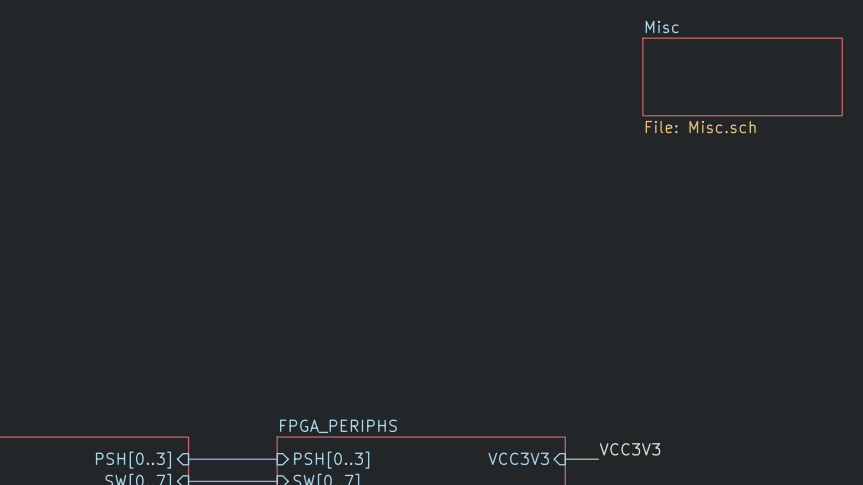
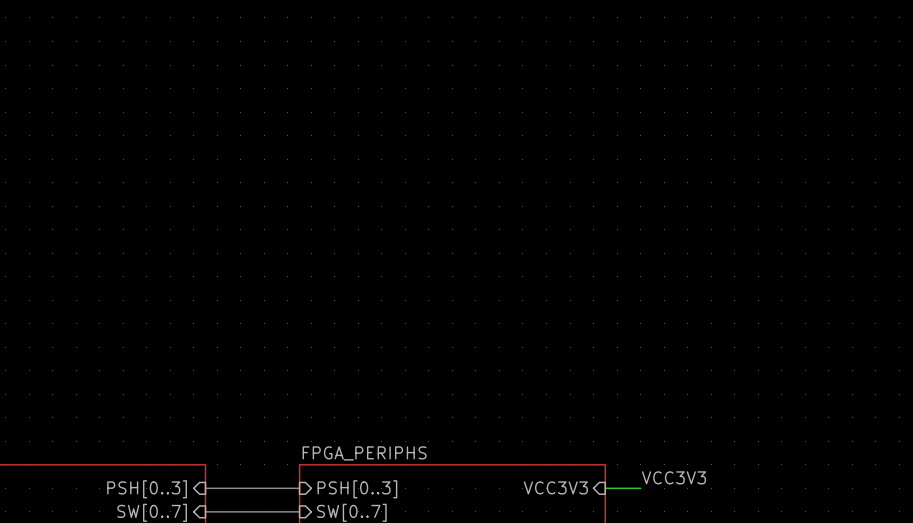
sheet Misc: File: Misc.sch (742, 76) -> none

